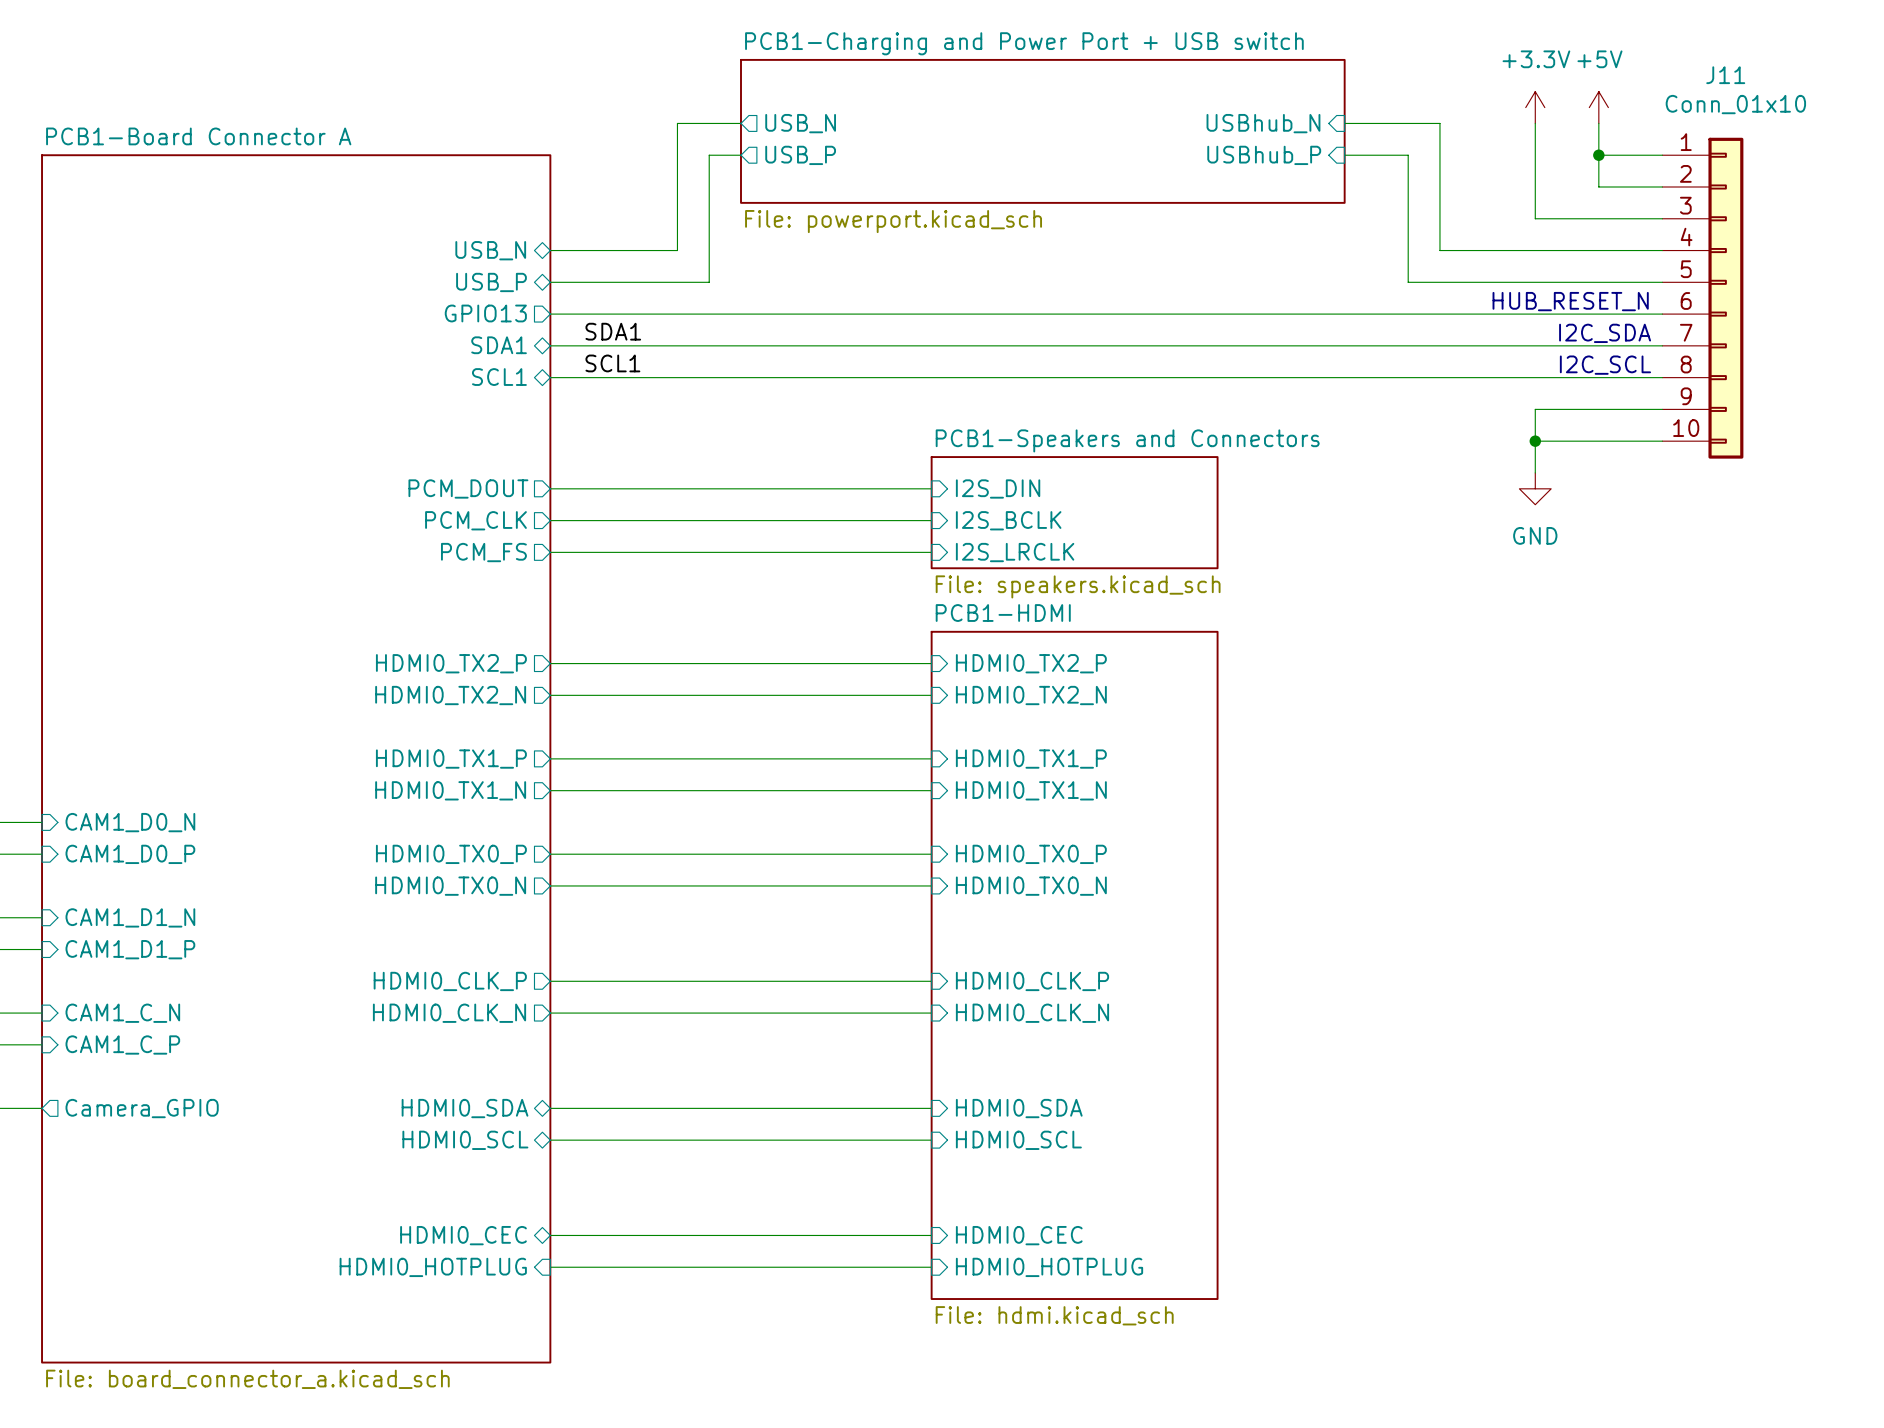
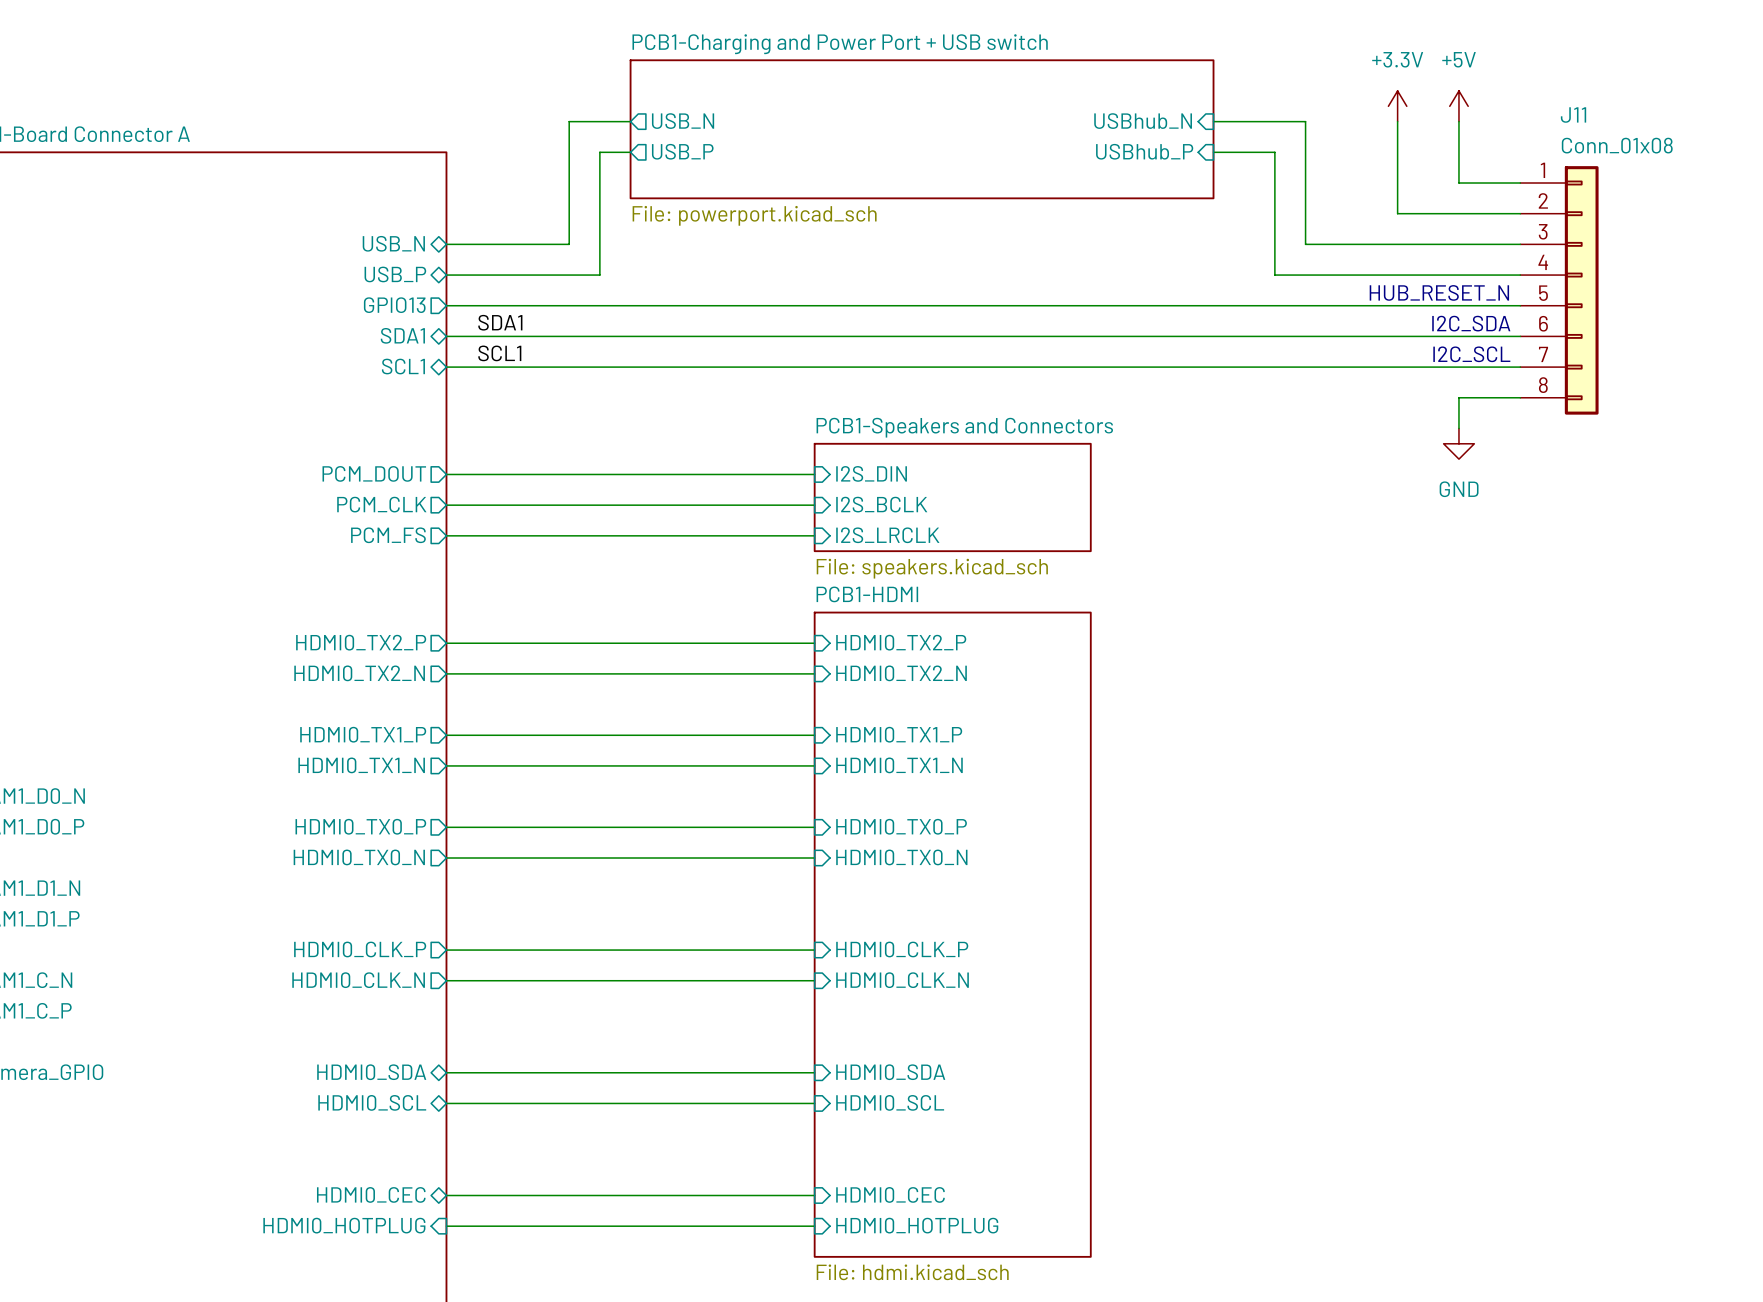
J11 name position: J11 (1725, 75) -> J11 (1573, 115)
J11 value: Conn_01x10 (1735, 104) -> Conn_01x08 (1617, 145)
J11 symbol: [1662, 137, 1744, 459] -> [1520, 166, 1599, 415]
wire: (1598, 155) (1662, 155) -> none
junction: (1598, 155) -> none
wire: (1598, 409) (1535, 409) (1535, 472) -> (1458, 397) (1458, 428)
wire: (1535, 441) (1662, 441) -> none
junction: (1535, 441) -> none
power symbol position: GND (1535, 488) -> GND (1458, 443)

